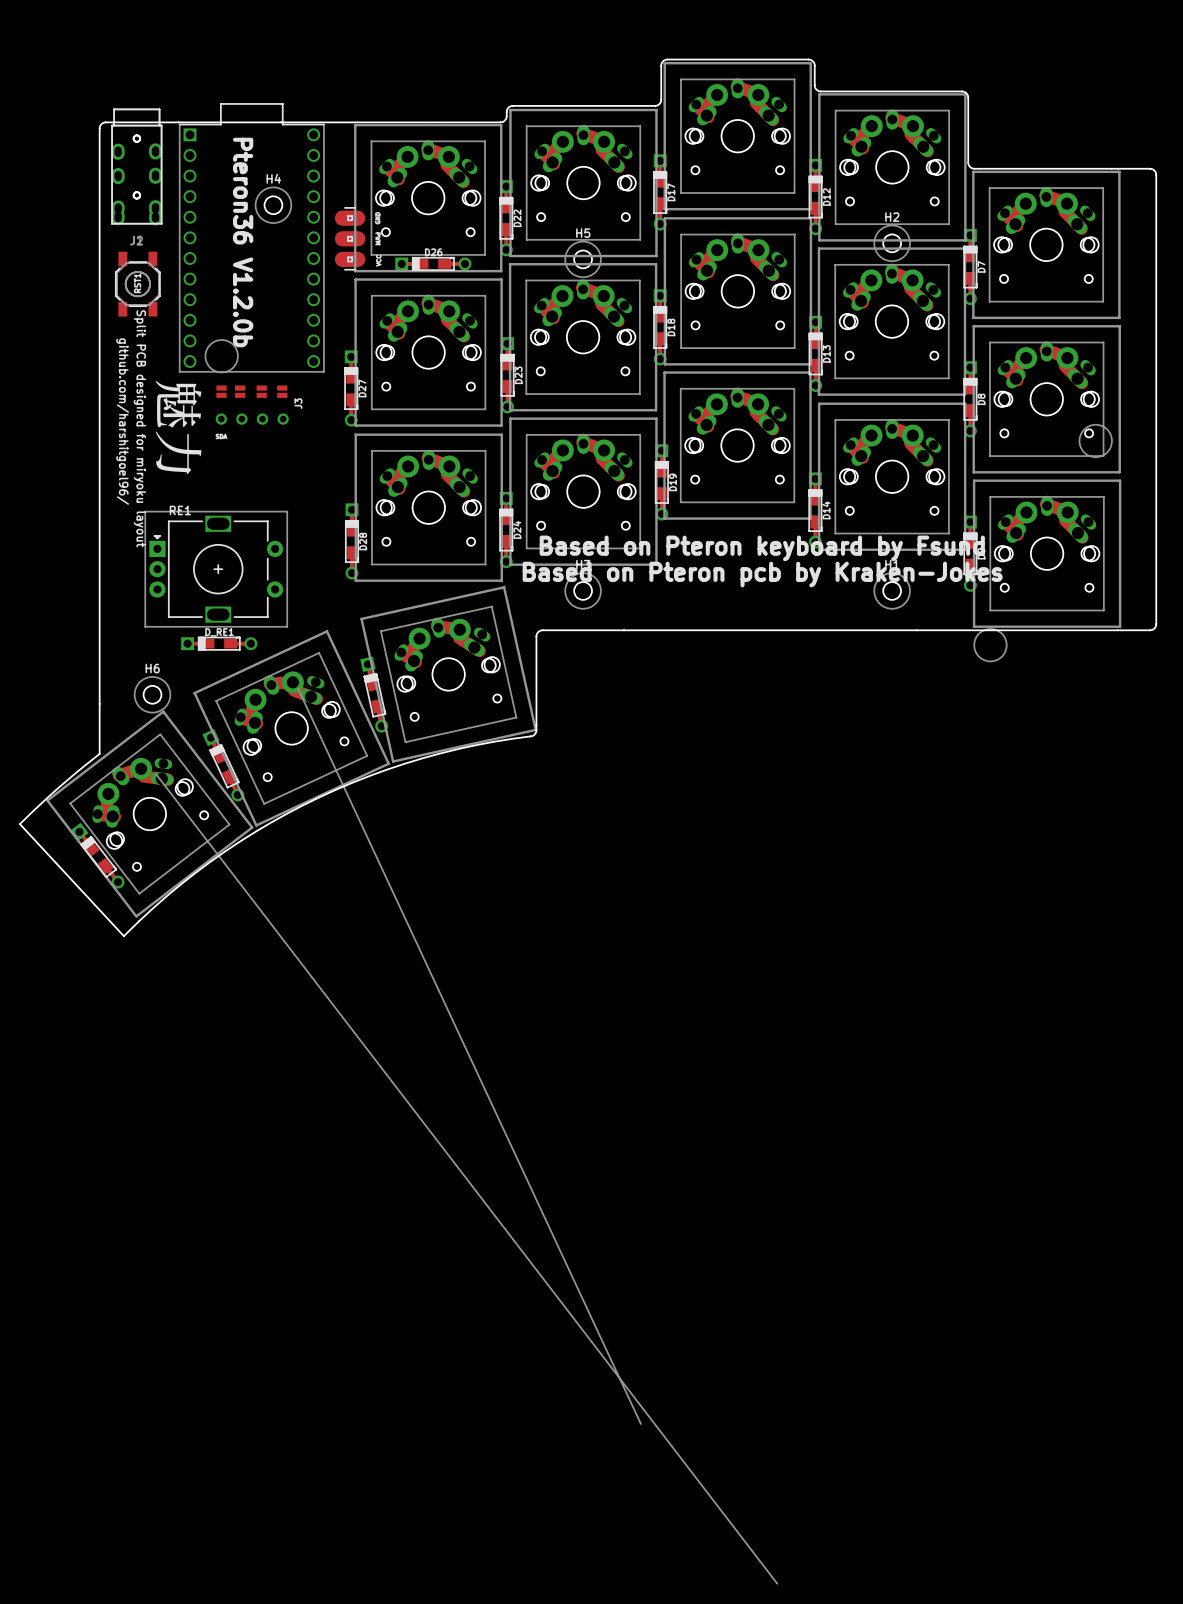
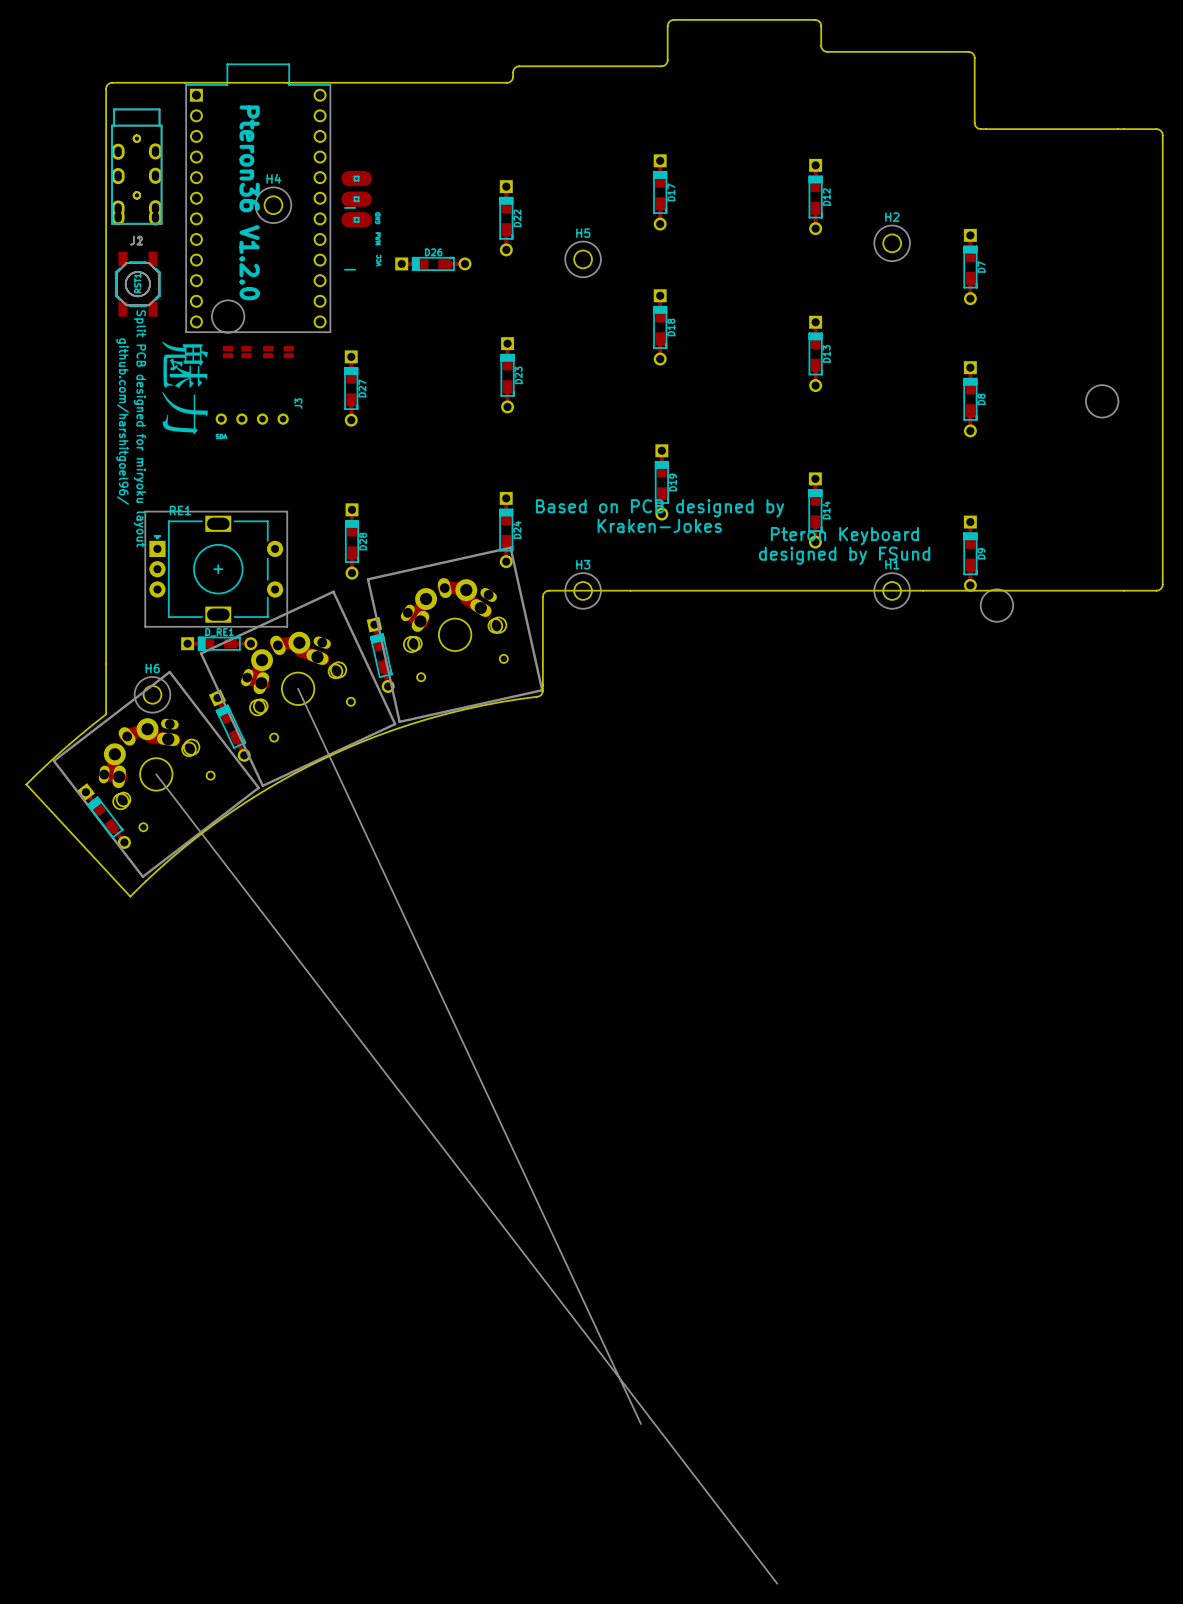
board edge: (667, 59) (809, 59) (814, 64) (814, 86) (819, 91) (964, 91) (968, 97) (968, 163) (972, 168) (1150, 168) (1154, 171) (1155, 627) (1150, 630) (541, 630) (536, 635) (536, 730) (534, 735) (458, 749) (405, 763) (353, 782) (303, 805) (255, 831) (209, 862) (166, 896) (123, 936) (19, 824) (58, 787) (99, 753) (100, 125) (105, 122) (500, 122) (505, 119) (507, 109) (512, 105) (655, 105) (661, 100) (661, 64) (667, 59) -> (673, 19) (815, 19) (820, 24) (821, 46) (825, 51) (970, 52) (974, 58) (974, 123) (979, 128) (1156, 129) (1161, 131) (1161, 587) (1156, 590) (547, 590) (542, 596) (542, 690) (540, 695) (464, 709) (411, 724) (359, 742) (309, 765) (261, 792) (216, 822) (172, 856) (130, 896) (26, 784) (65, 748) (106, 714) (106, 85) (112, 82) (506, 82) (511, 80) (513, 70) (518, 66) (662, 66) (667, 60) (667, 24) (673, 19)
part: (737, 136) -> none
part: (892, 167) -> none
part: (583, 183) -> none
part: (428, 198) -> none
part position: (251, 237) -> (258, 198)
part position: (350, 238) -> (356, 199)
text: Pteron36 V1.2.0b (243, 242) -> Pteron36 V1.2.0 (249, 202)
part: (1046, 244) -> none
part: (737, 291) -> none
part: (891, 321) -> none
part: (583, 337) -> none
part: none -> (227, 352)
part: none -> (246, 352)
part: none -> (268, 352)
part: none -> (288, 352)
part: (428, 352) -> none
drawing position: (221, 356) -> (228, 316)
part: (221, 391) -> none
part: (240, 391) -> none
part: (261, 391) -> none
part: (282, 391) -> none
part: (1046, 399) -> none
drawing position: (178, 427) -> (185, 388)
drawing position: (1095, 440) -> (1102, 401)
part: (737, 445) -> none
part: (892, 476) -> none
part: (583, 491) -> none
part: (428, 507) -> none
text: none -> Based on PCB designed by (660, 508)
text: none -> Kraken-Jokes (659, 525)
text: none -> Pteron Keyboard (844, 536)
text: Based on Pteron keyboard by Fsund (762, 548) -> none
part: (1047, 553) -> none
text: none -> designed by FSund (844, 555)
text: Based on Pteron pcb by Kraken-Jokes (762, 574) -> none
part: none -> (455, 634)
drawing position: (990, 645) -> (996, 605)
part: (448, 674) -> none
part: none -> (298, 688)
part position: (374, 694) -> (380, 654)
part: (291, 728) -> none
part position: (223, 765) -> (229, 725)
part: none -> (156, 774)
part: (149, 814) -> none
part position: (97, 855) -> (103, 816)

